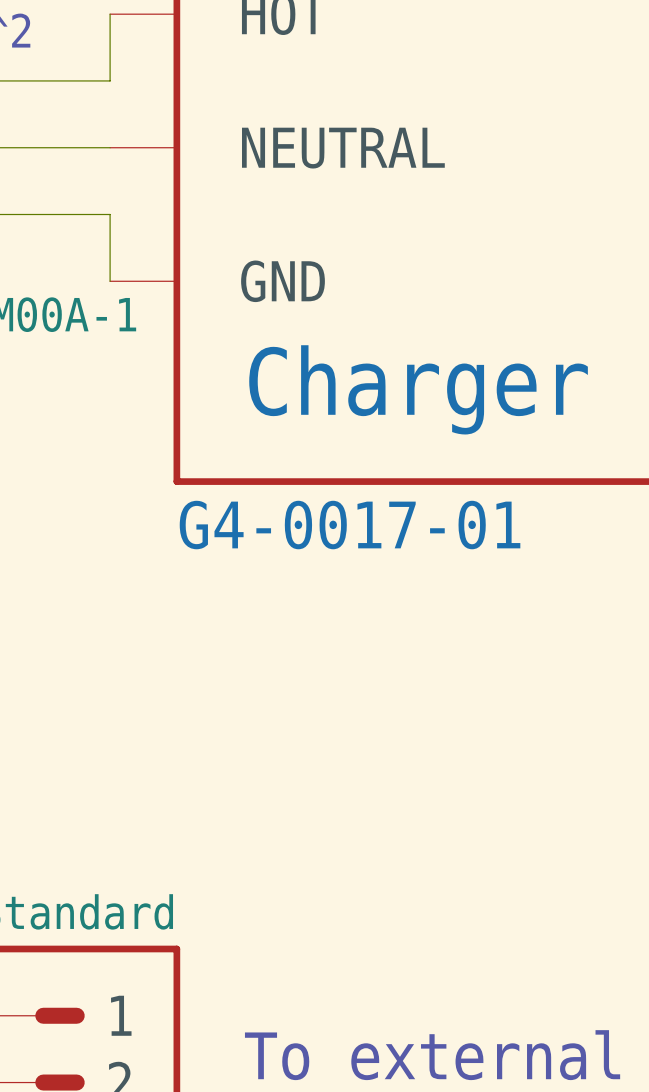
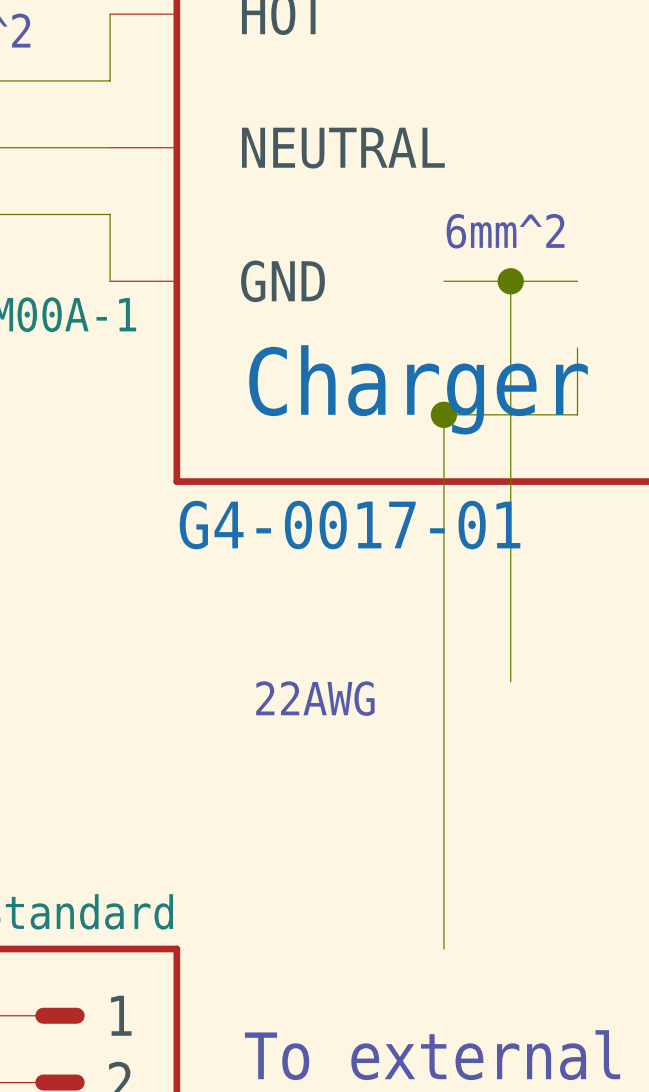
text: none -> 6mm^2 (505, 231)
wire: none -> (443, 281) (577, 281)
wire: none -> (510, 281) (510, 681)
junction: none -> (510, 281)
wire: none -> (577, 348) (577, 414) (443, 414) (443, 948)
junction: none -> (443, 414)
text: none -> 22AWG (315, 698)

